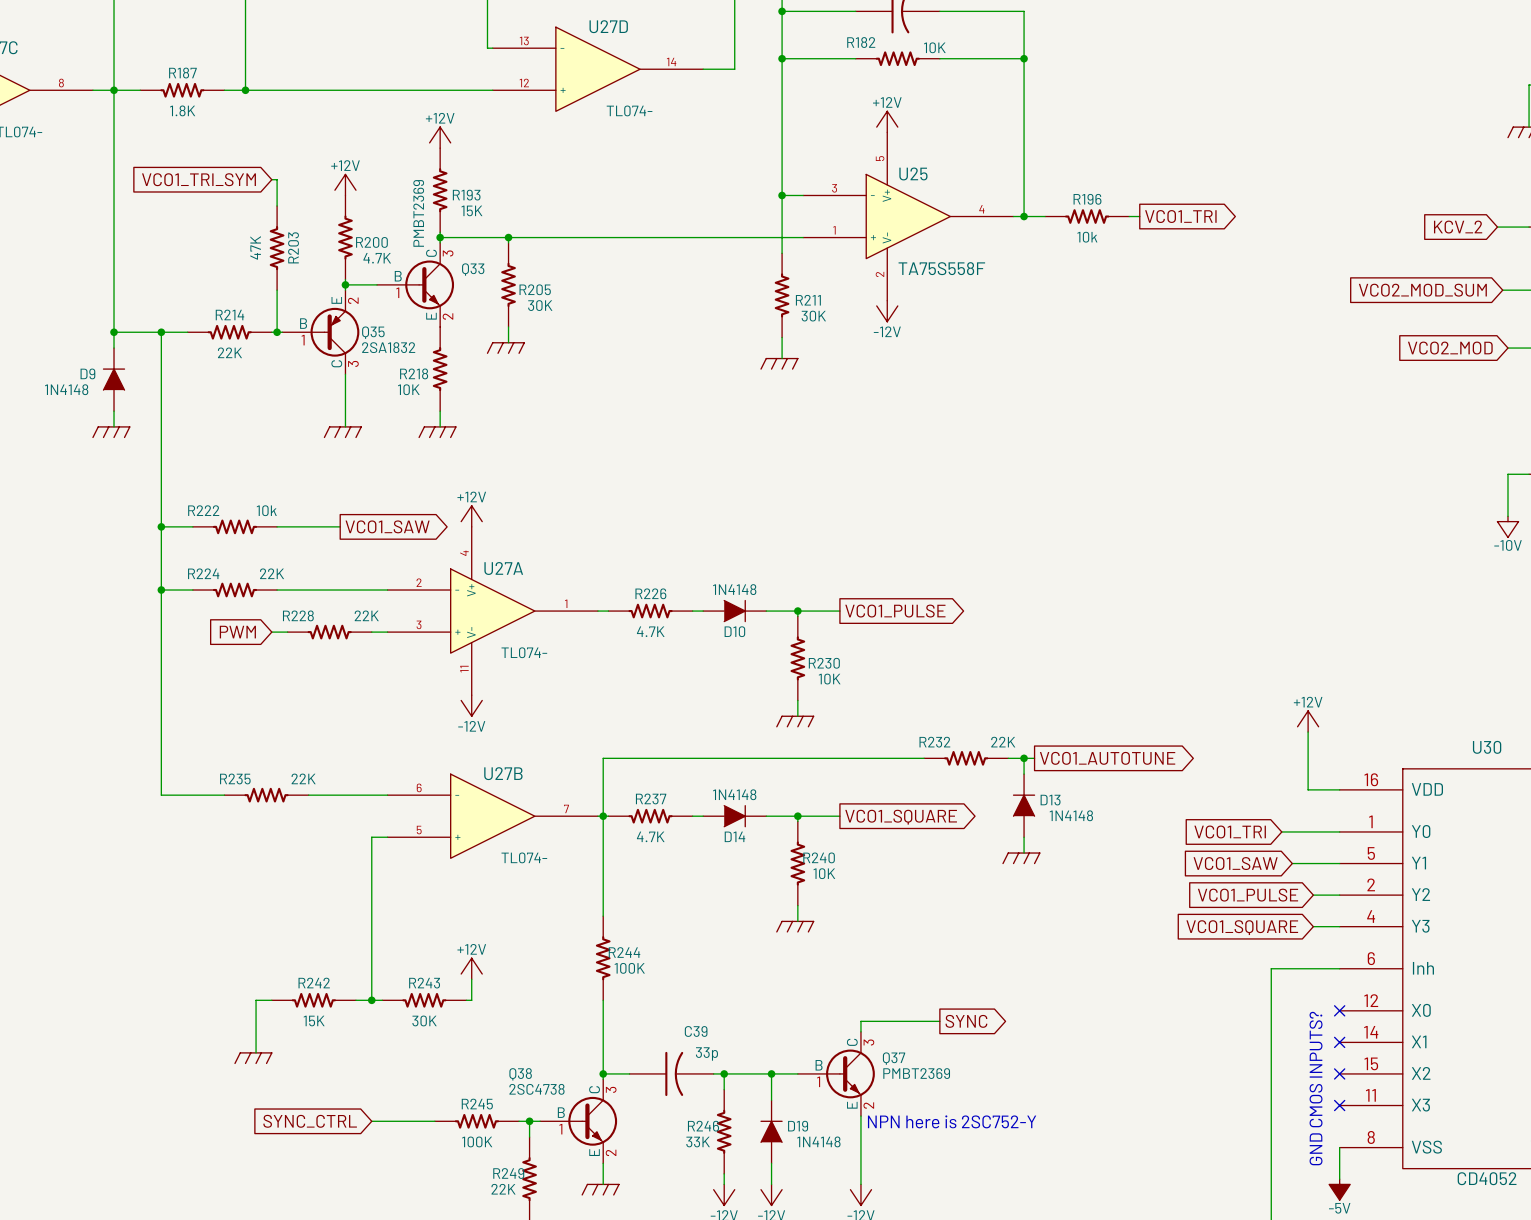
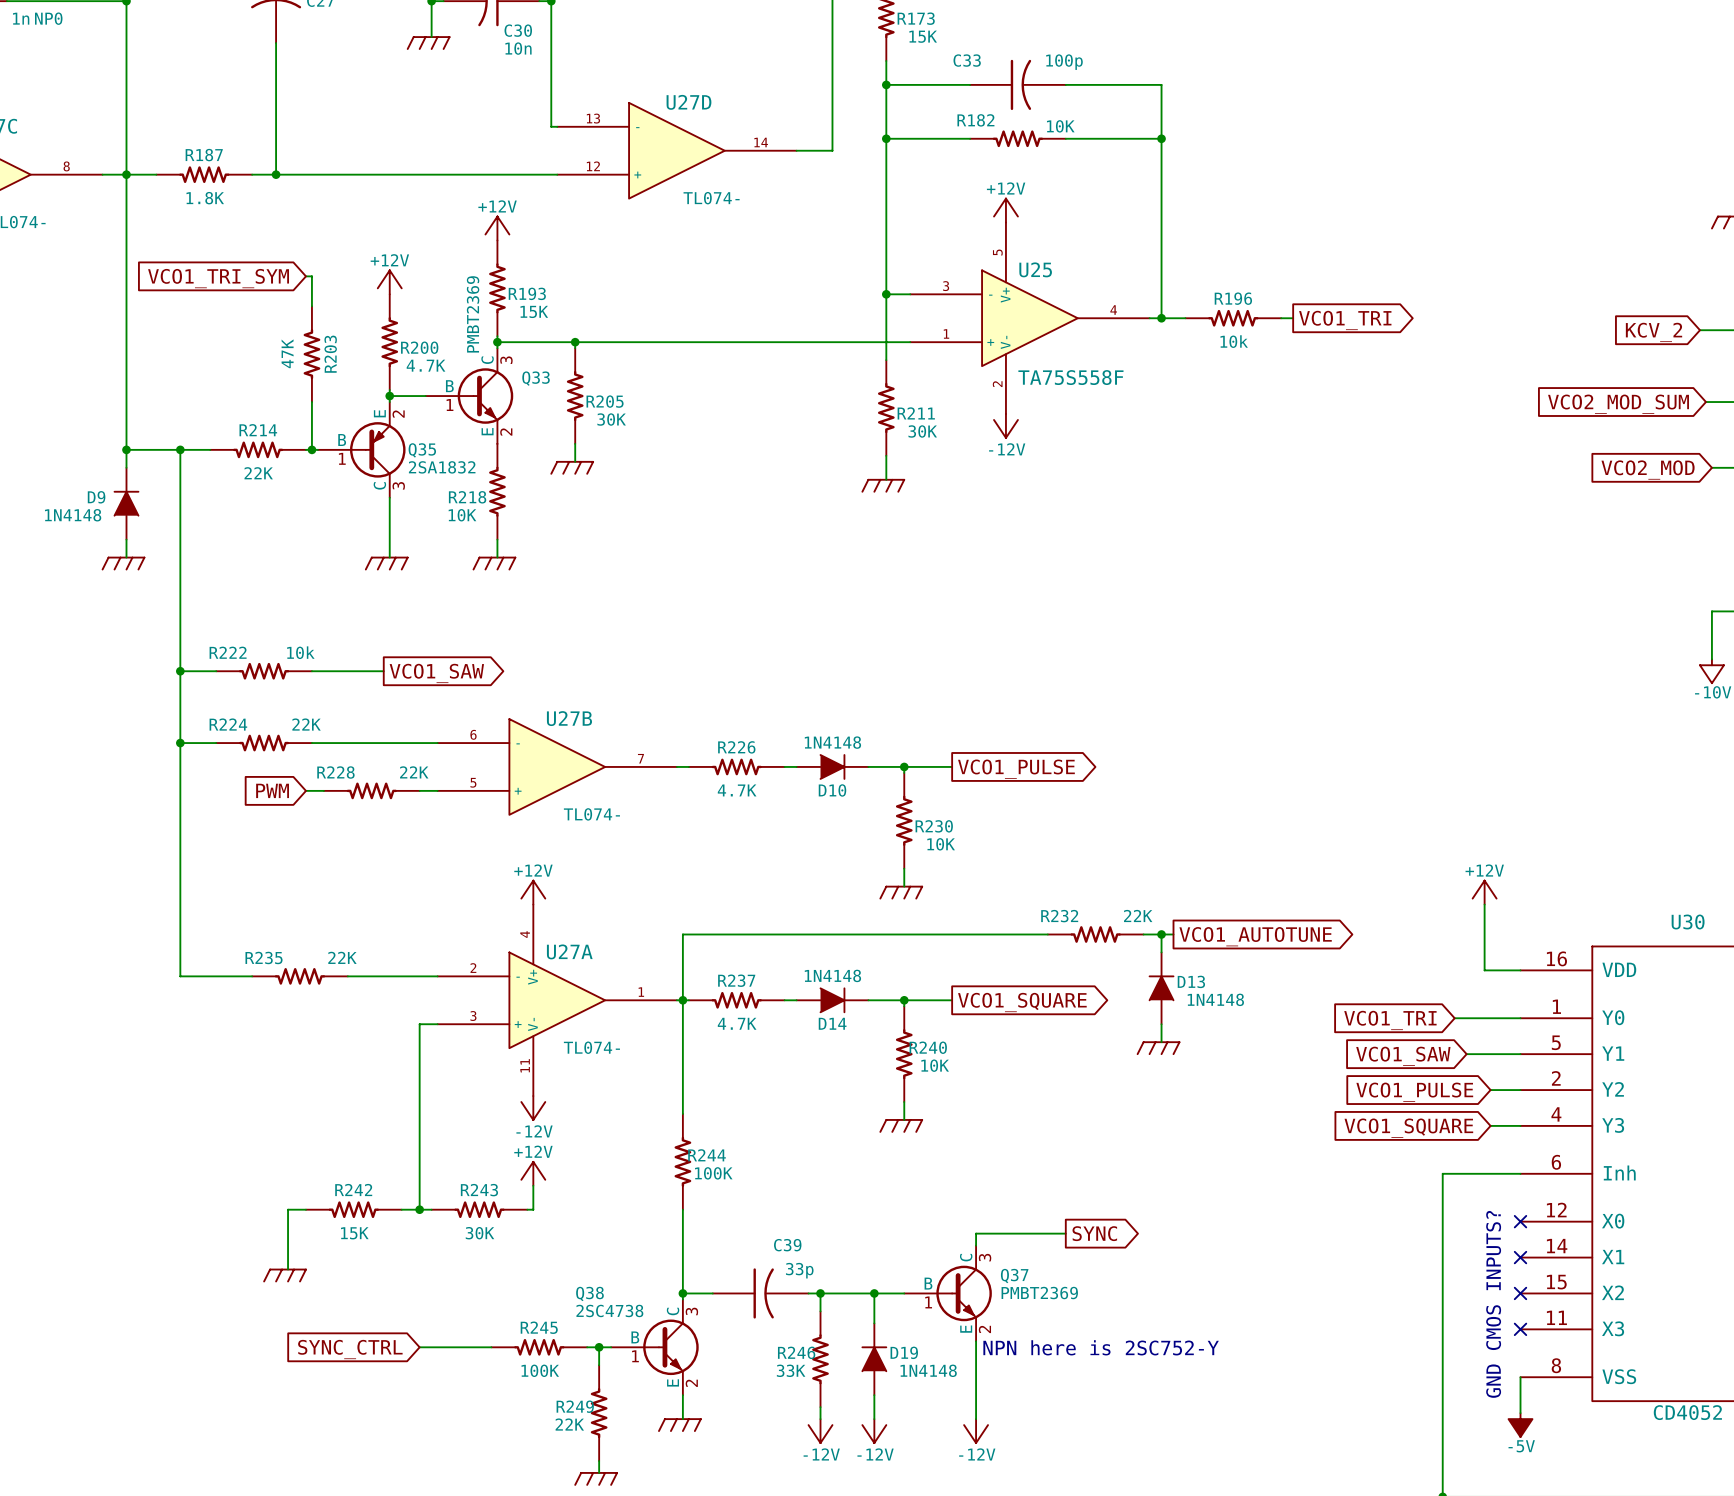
power symbol position: +12V (471, 516) -> +12V (533, 892)
U27A position: (492, 611) -> (557, 1000)
power symbol position: -12V (471, 705) -> -12V (533, 1107)
U27B position: (492, 816) -> (557, 766)

